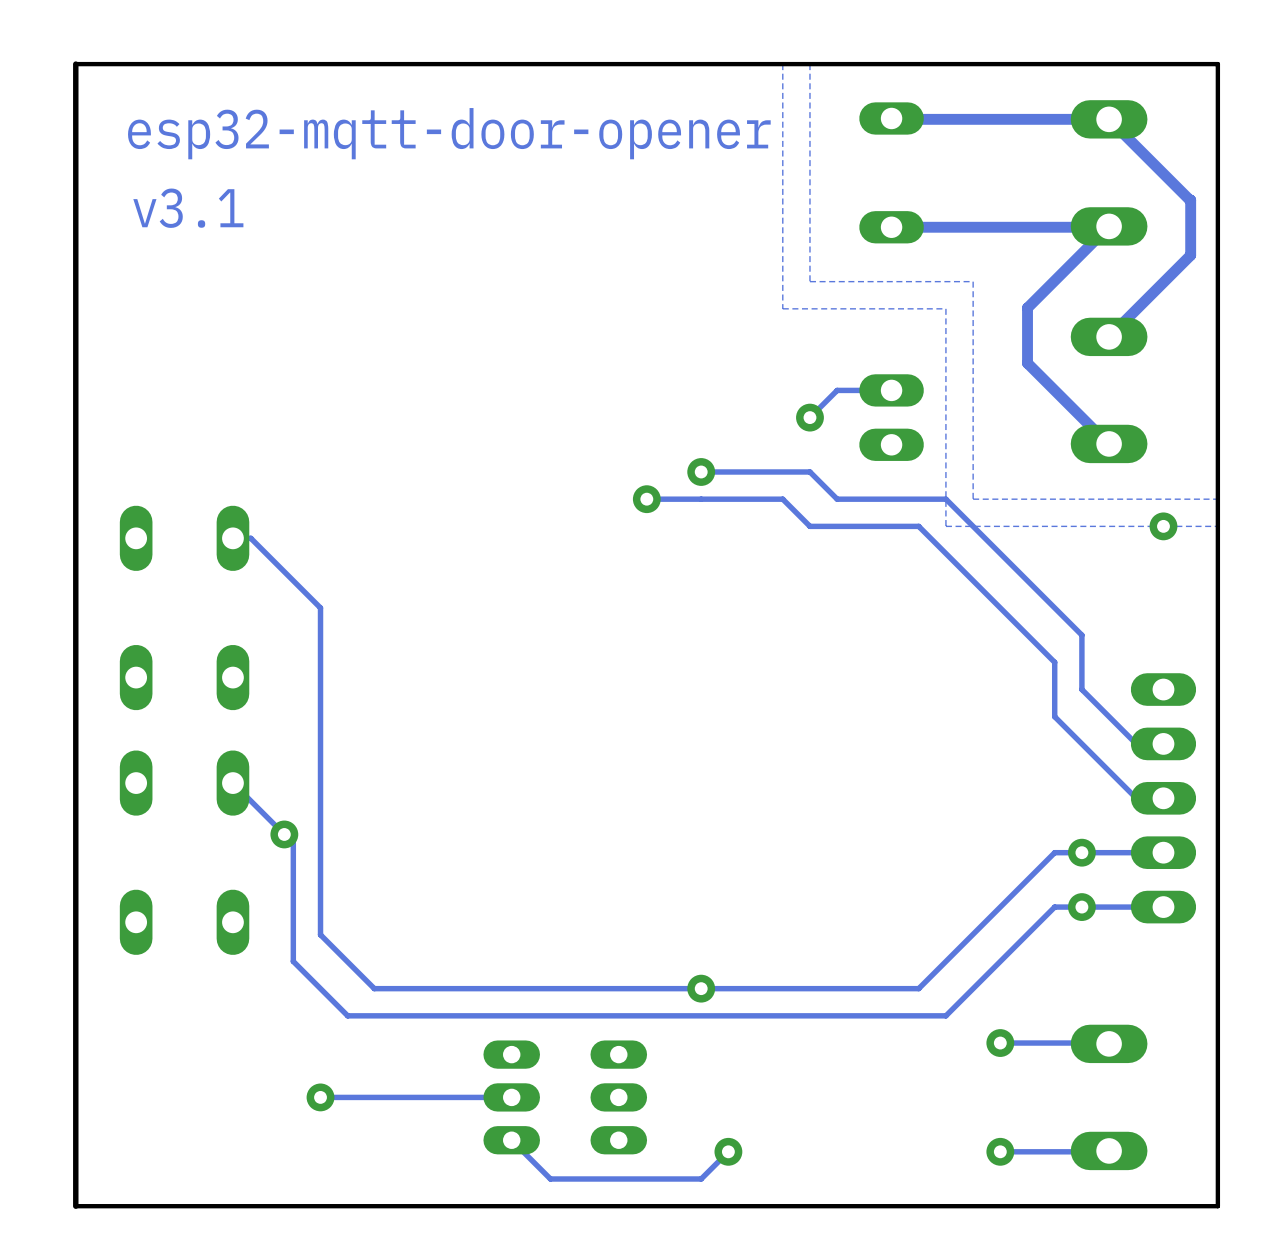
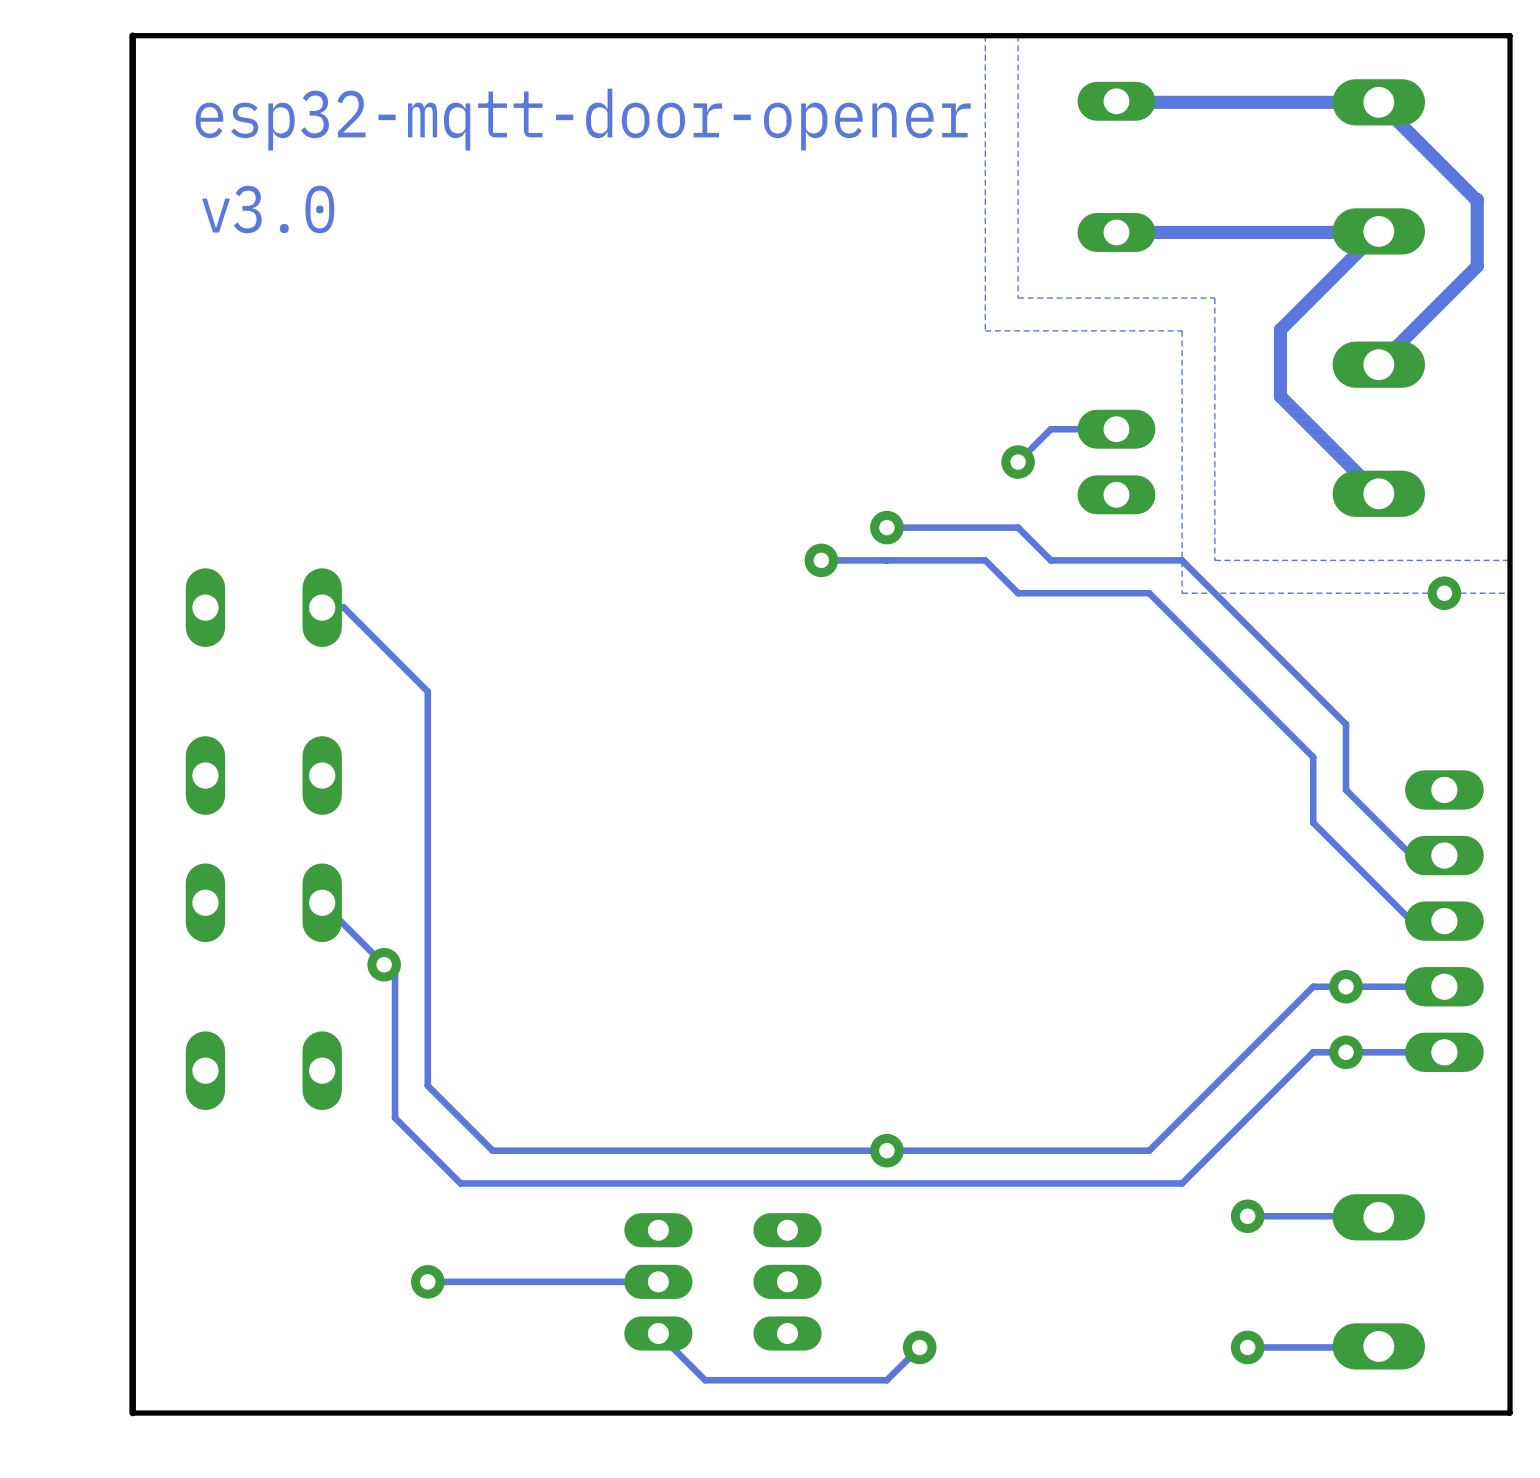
text: 3.1 (201, 208) -> 3.0 (284, 209)

